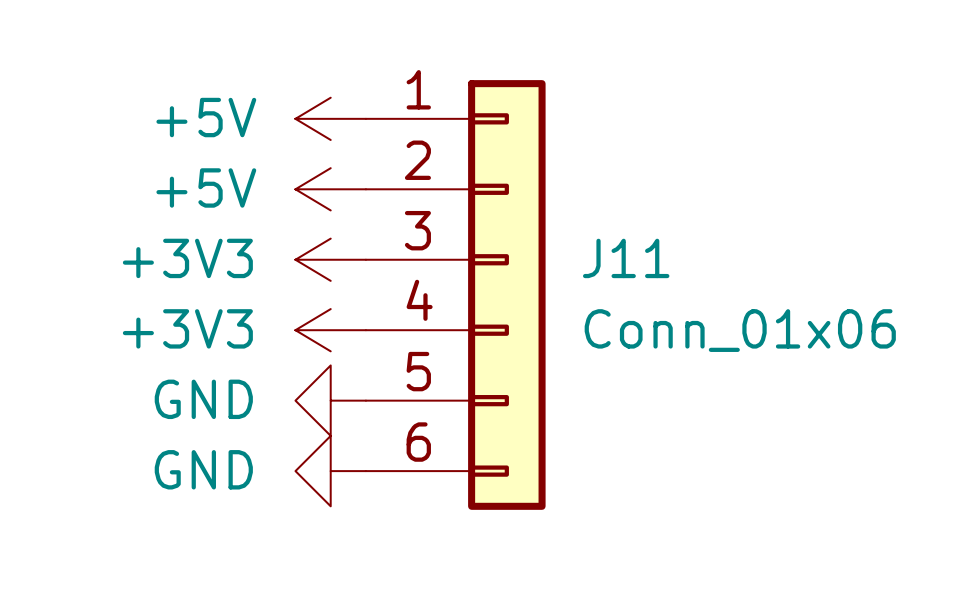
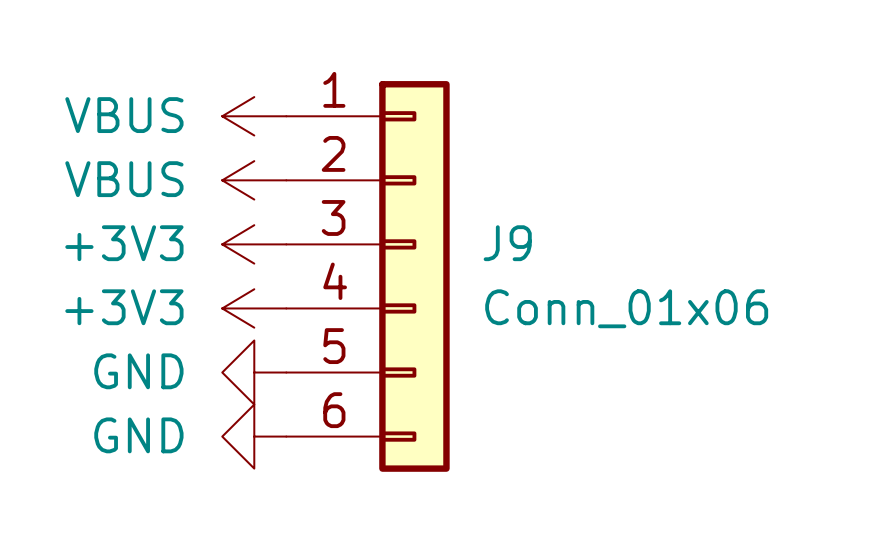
power symbol: +5V (330, 118) -> VBUS (254, 116)
power symbol: +5V (330, 189) -> VBUS (254, 180)
J11 name: J11 (626, 258) -> J9 (507, 243)

